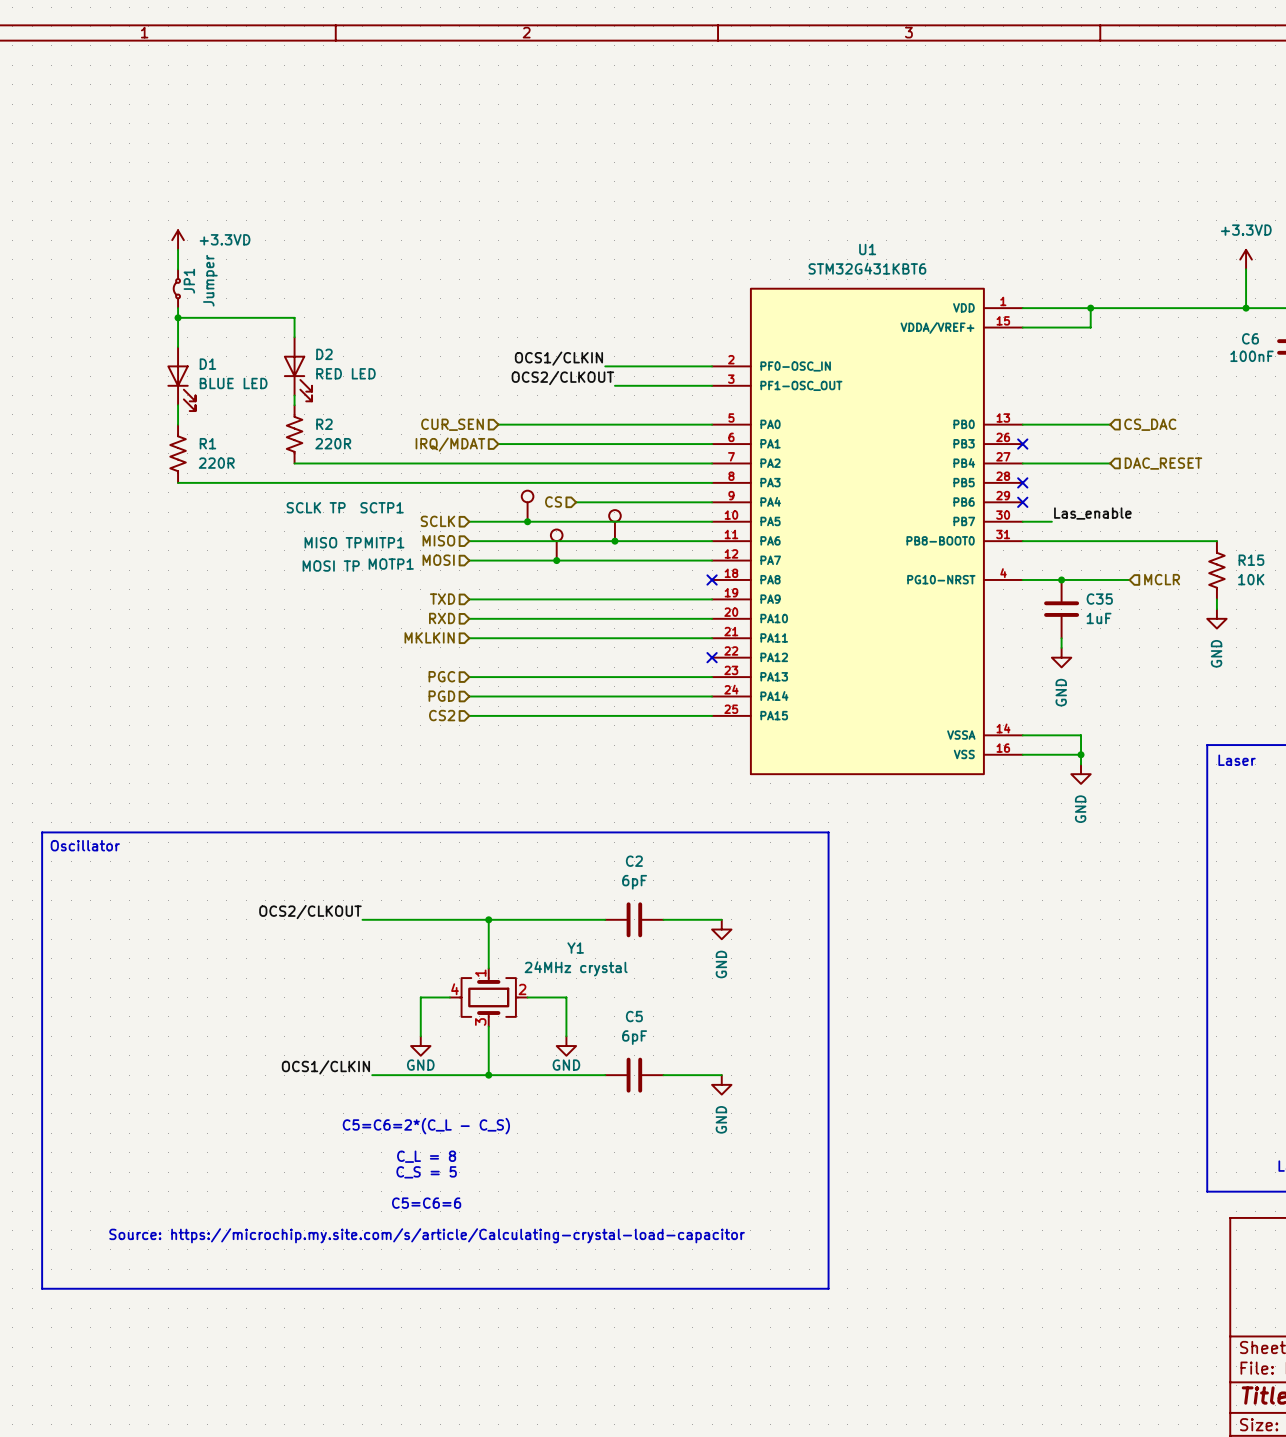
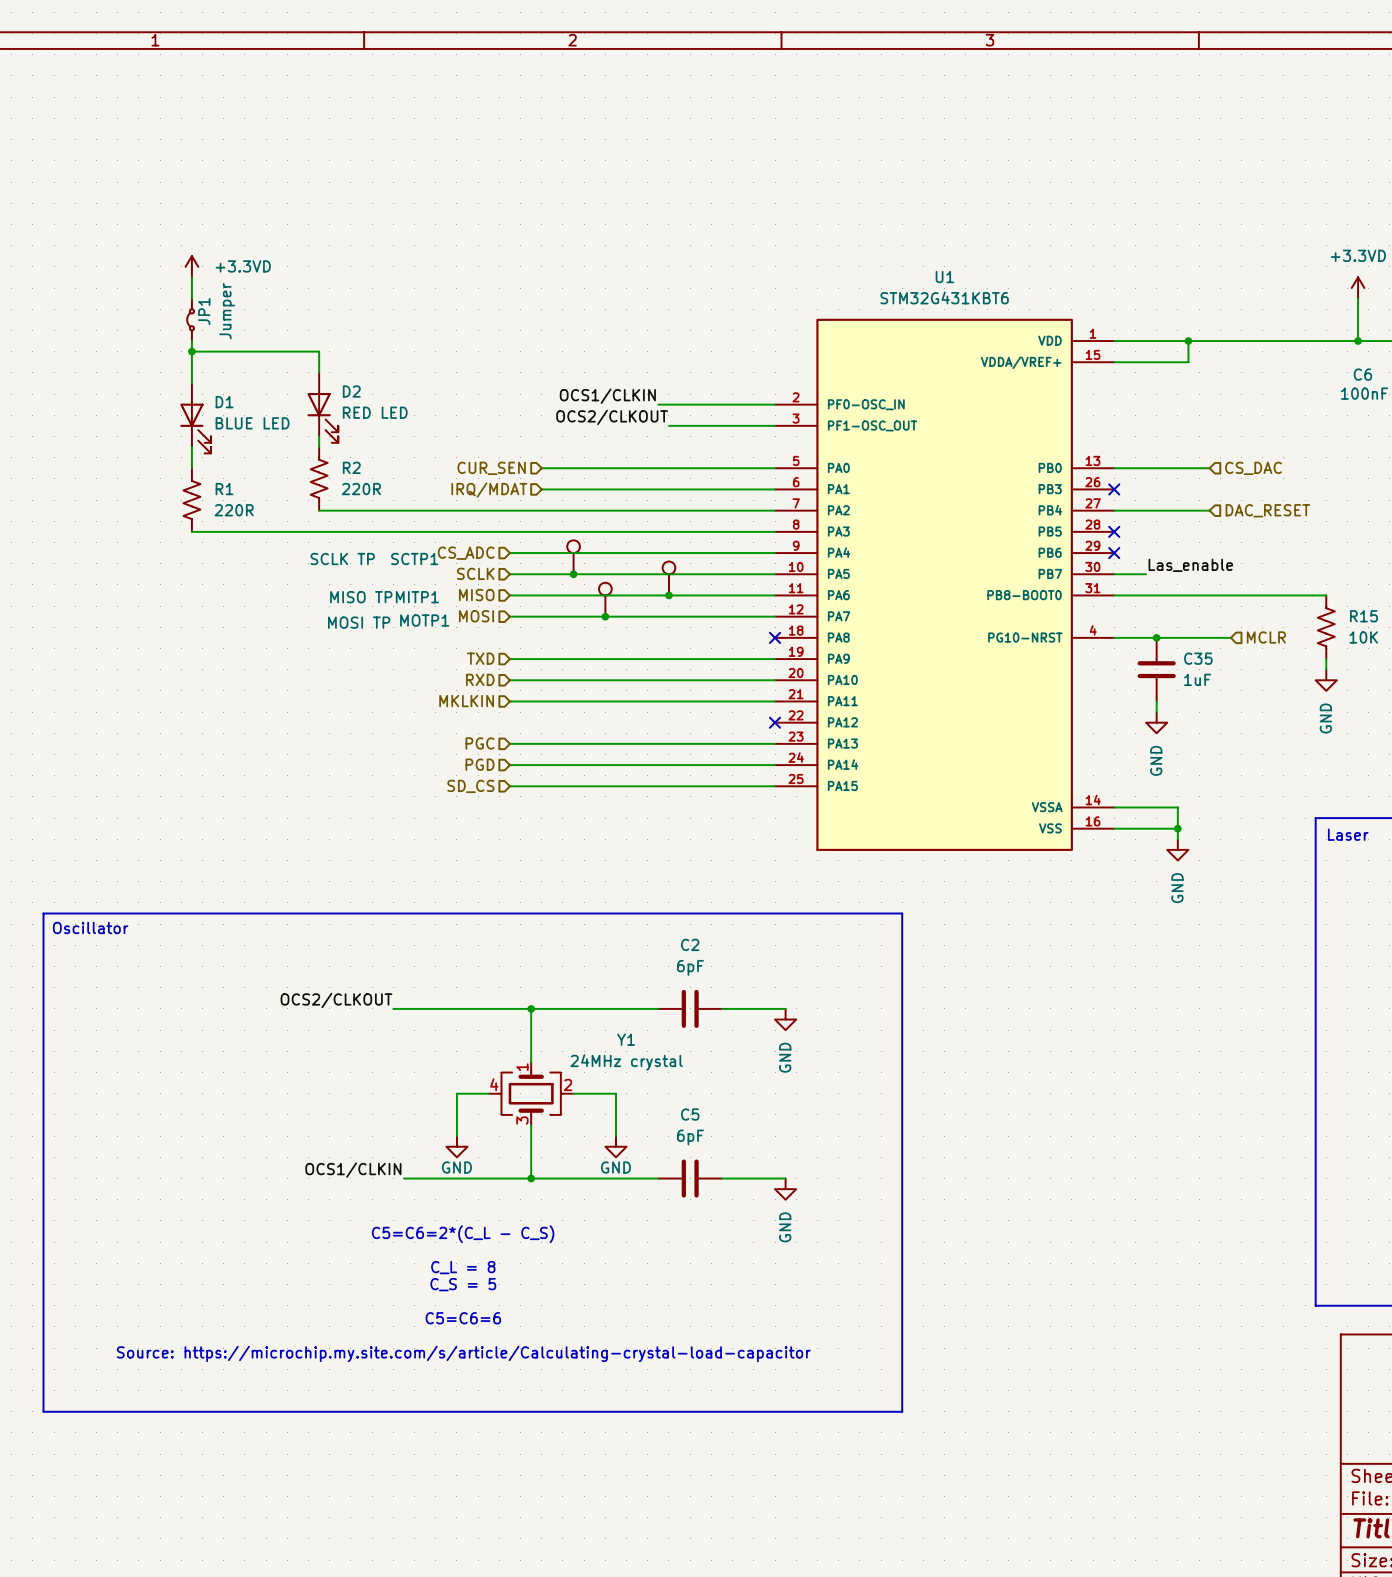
hierarchical label: CS (553, 501) -> none
hierarchical label: none -> CS_ADC (466, 553)
wire: none -> (509, 553) (626, 553)
hierarchical label: CS2 (442, 715) -> SD_CS (470, 786)

